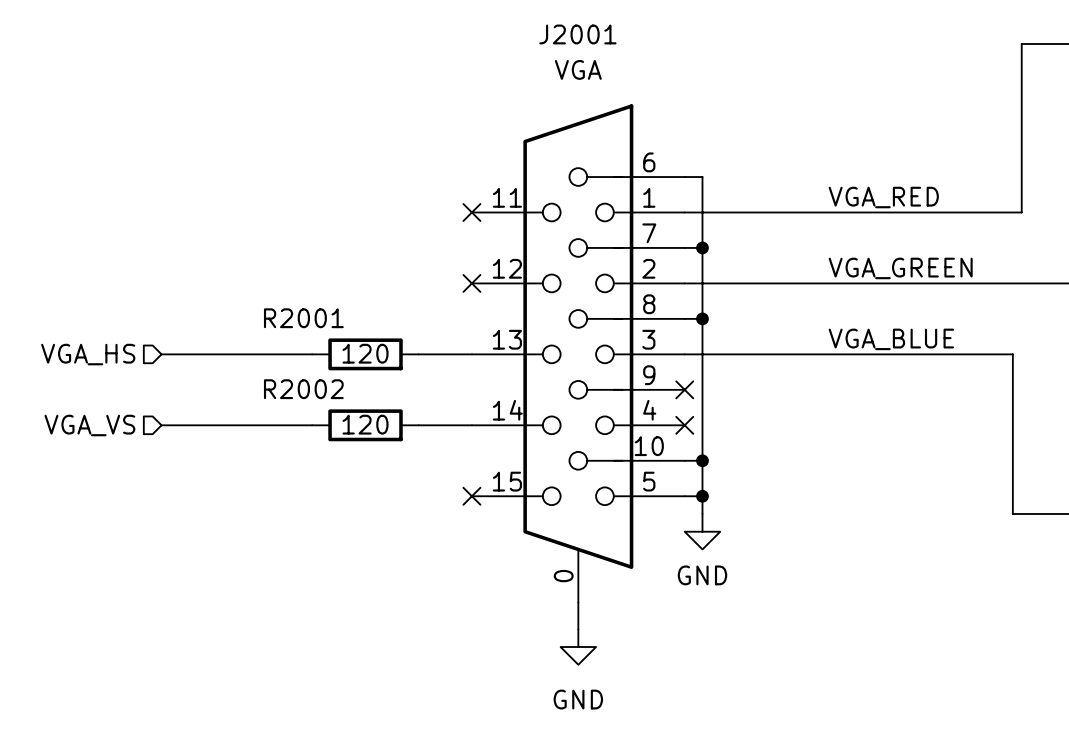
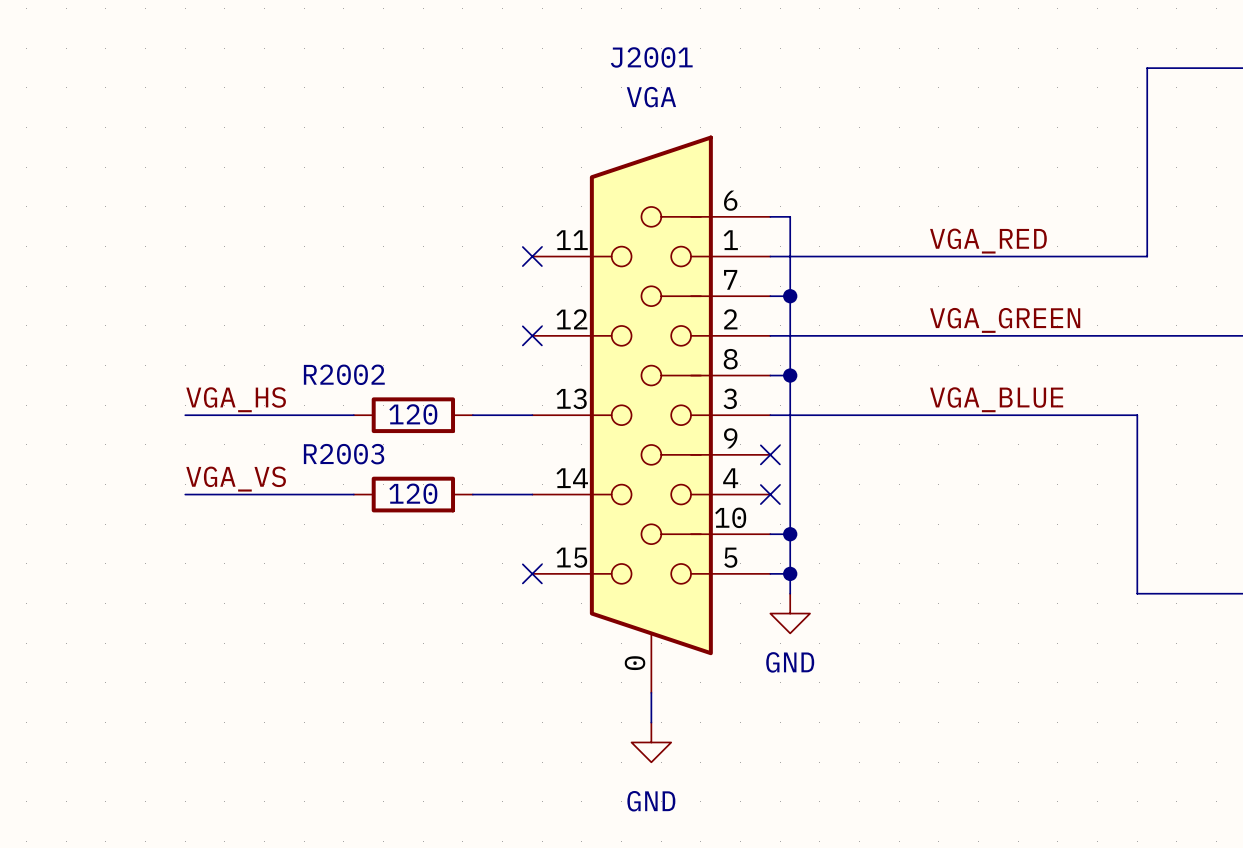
R2001 name: R2001 (303, 318) -> R2002 (344, 374)
label: none -> VGA_HS (236, 399)
hierarchical label: VGA_HS (88, 354) -> none
R2002 name: R2002 (303, 389) -> R2003 (344, 454)
label: none -> VGA_VS (236, 479)
hierarchical label: VGA_VS (89, 425) -> none

